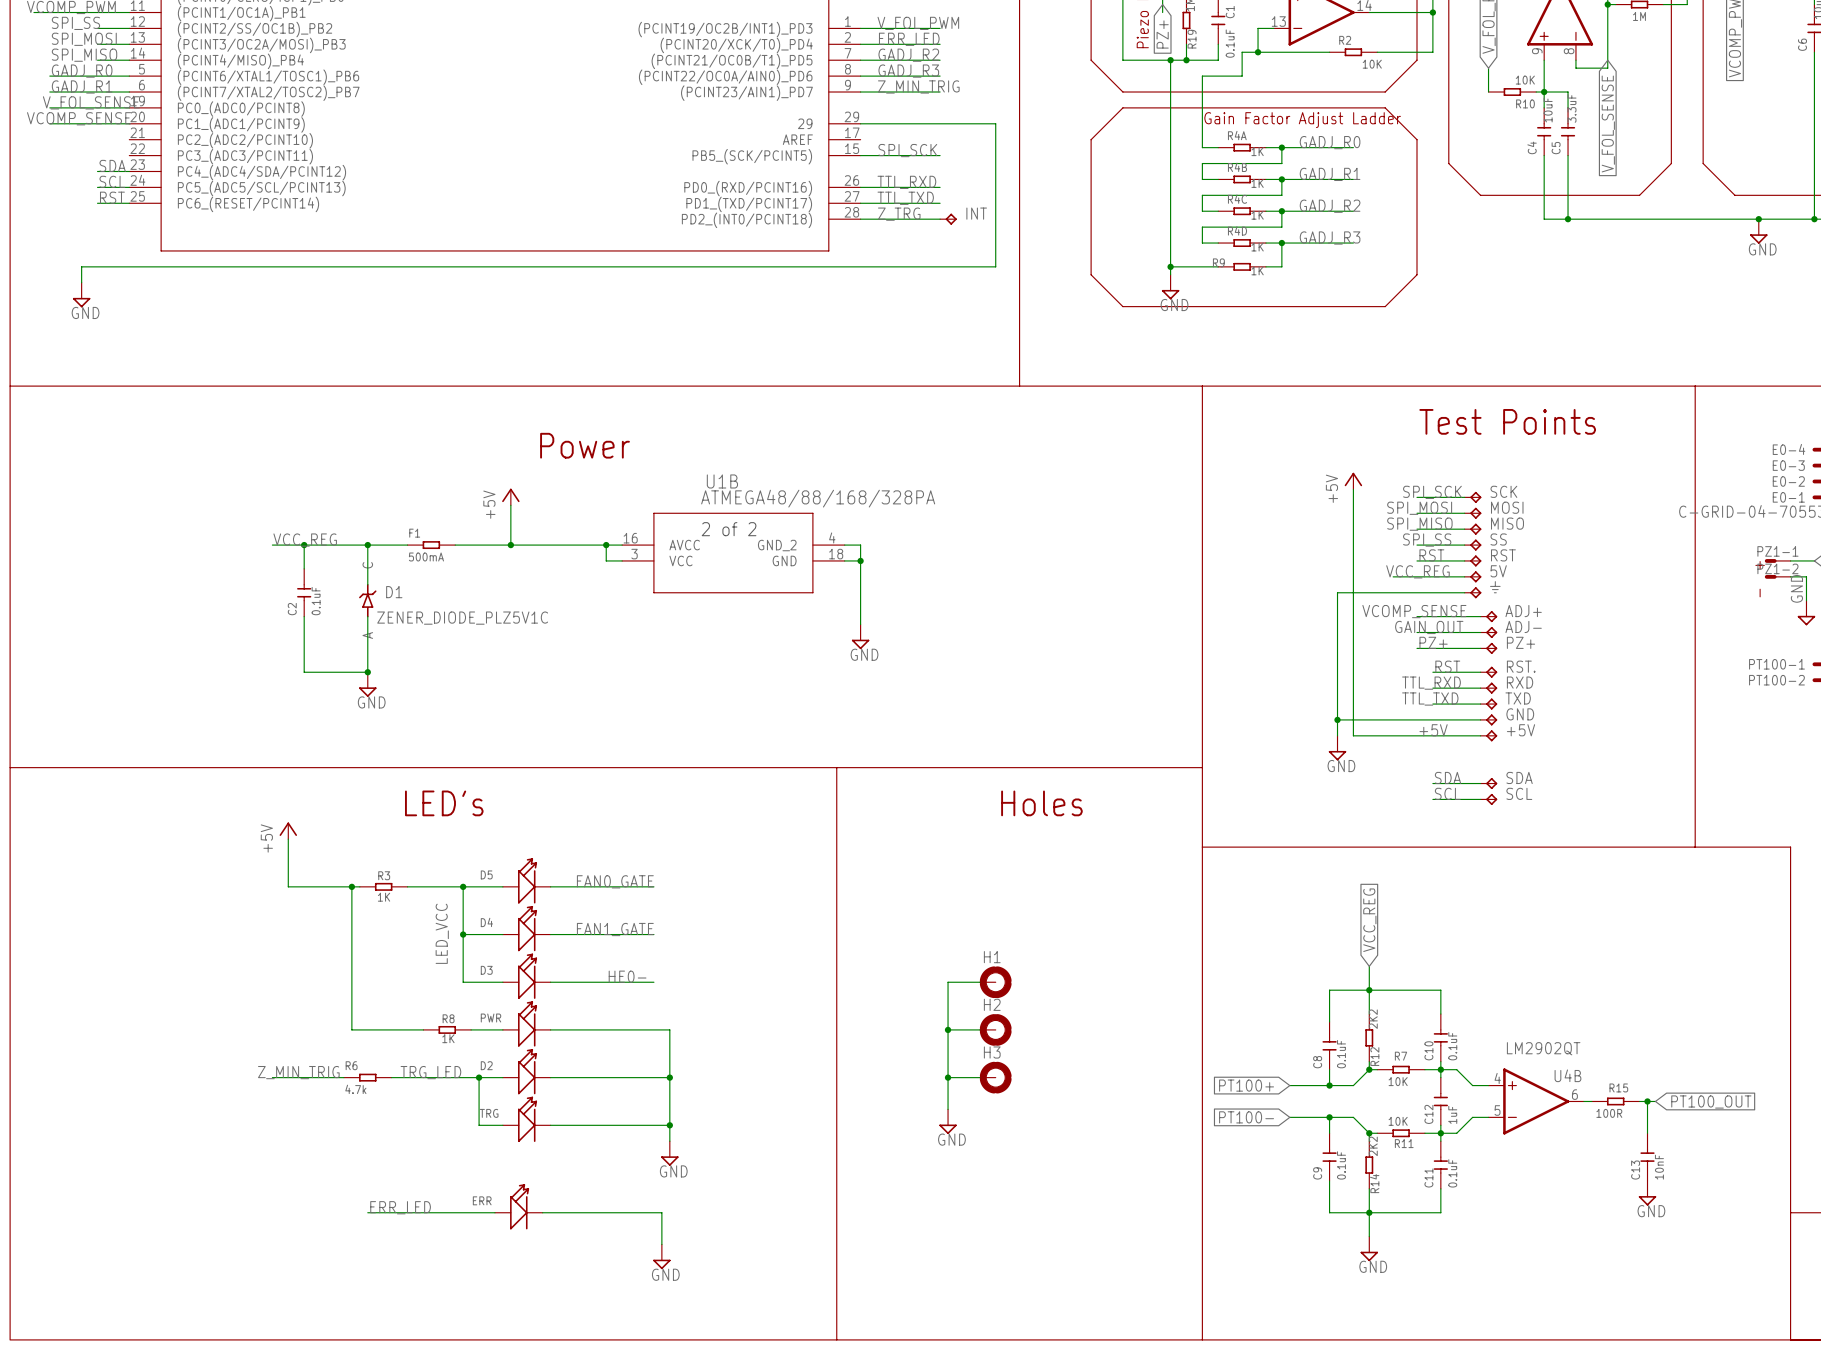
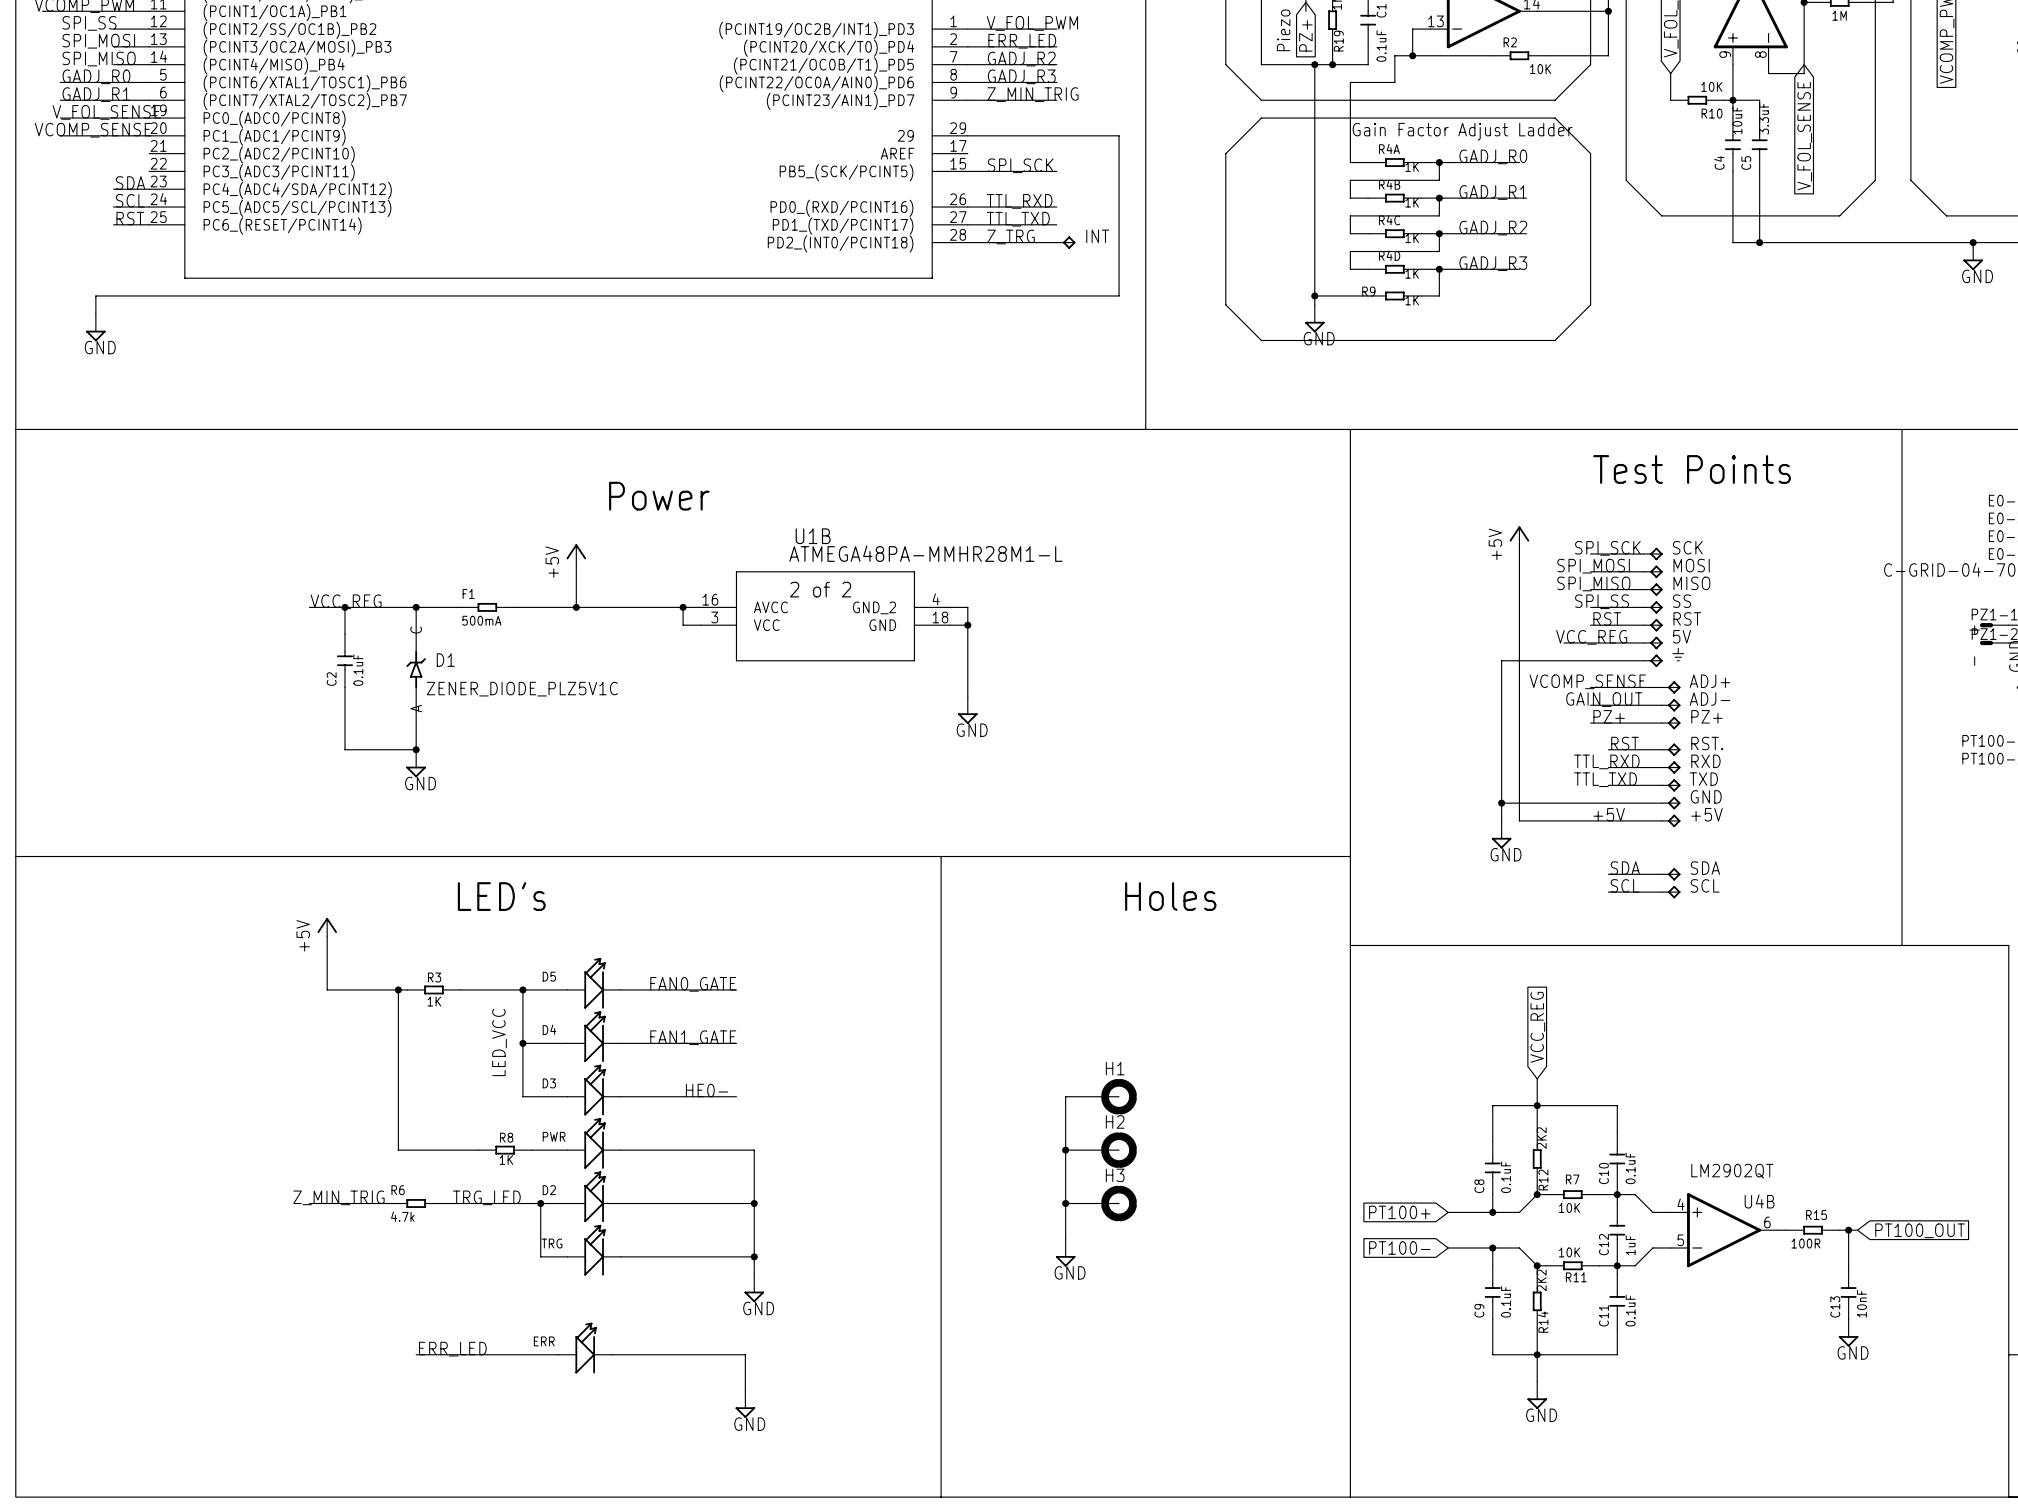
U1B value: ATMEGA48/88/168/328PA (818, 498) -> ATMEGA48PA-MMHR28M1-L (925, 553)

